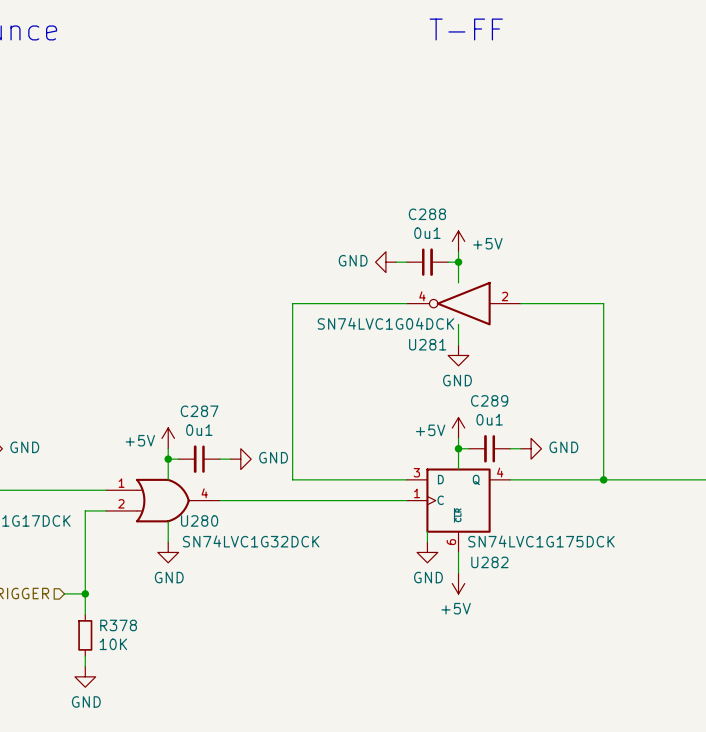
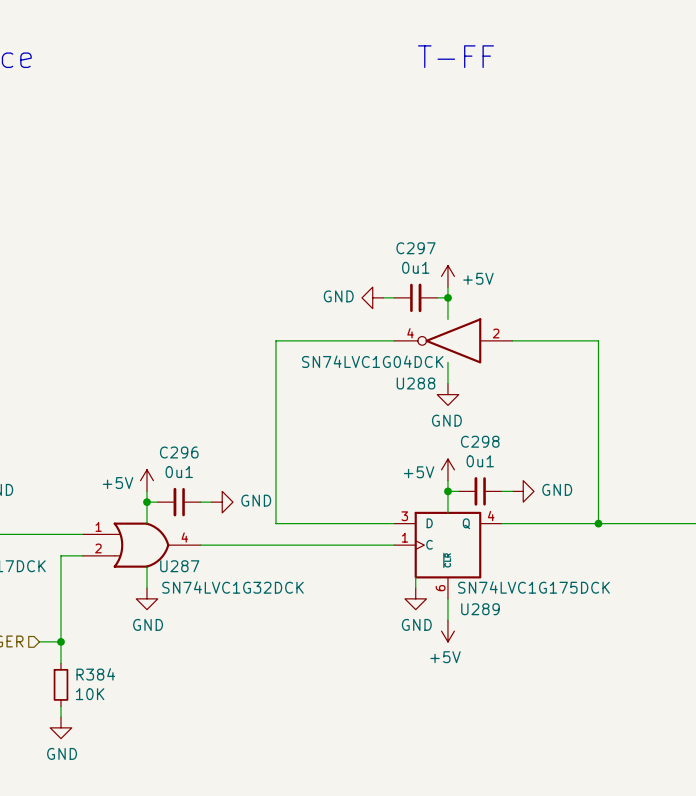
C288 name: C288 (427, 214) -> C297 (415, 248)
U281 name: U281 (427, 344) -> U288 (415, 383)
C289 name: C289 (489, 400) -> C298 (480, 441)
C287 name: C287 (199, 411) -> C296 (179, 452)
U280 name: U280 (199, 520) -> U287 (179, 566)
U282 name: U282 (489, 562) -> U289 (480, 609)
R378 name: R378 (118, 625) -> R384 (95, 674)

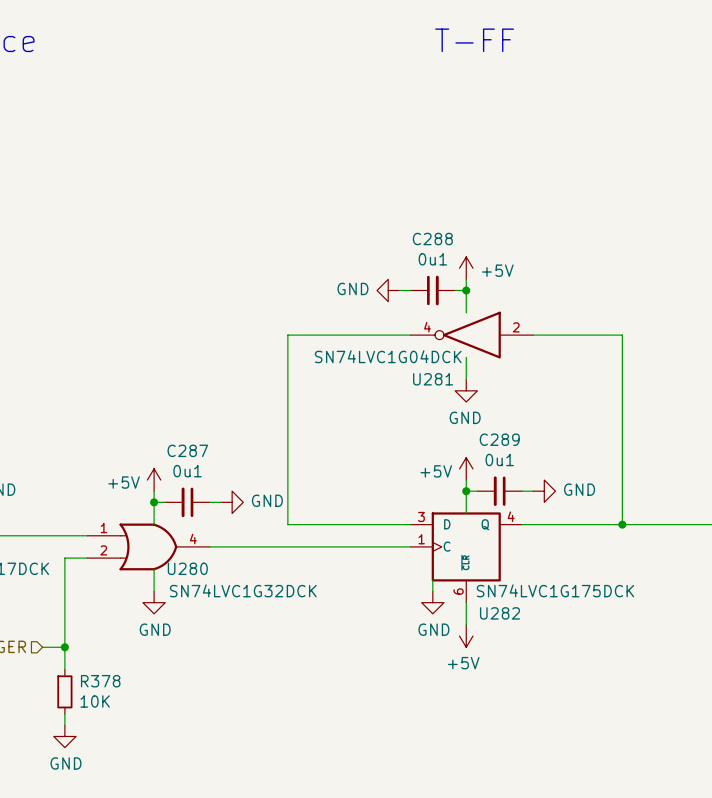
C297 name: C297 (415, 248) -> C288 (432, 239)
U288 name: U288 (415, 383) -> U281 (433, 379)
C298 name: C298 (480, 441) -> C289 (499, 439)
C296 name: C296 (179, 452) -> C287 (187, 450)
U287 name: U287 (179, 566) -> U280 (187, 568)
U289 name: U289 (480, 609) -> U282 (499, 613)
R384 name: R384 (95, 674) -> R378 (100, 681)

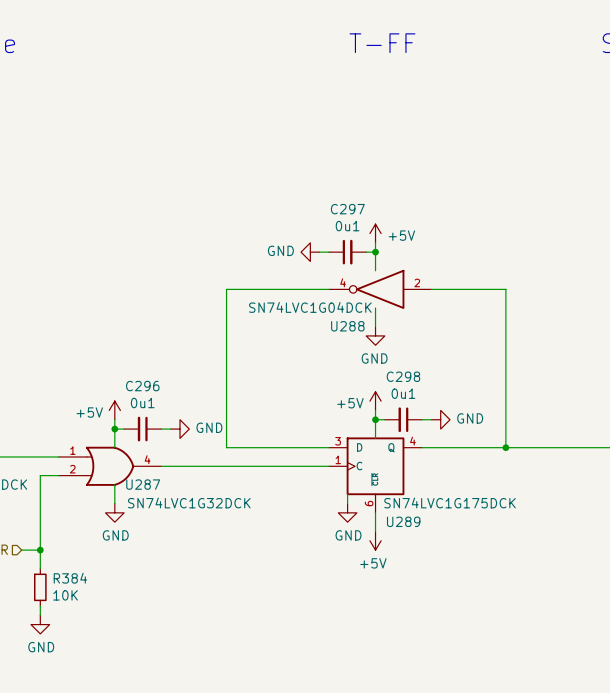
C288 name: C288 (432, 239) -> C297 (347, 209)
U281 name: U281 (433, 379) -> U288 (347, 326)
C289 name: C289 (499, 439) -> C298 (403, 376)
C287 name: C287 (187, 450) -> C296 (142, 386)
U280 name: U280 (187, 568) -> U287 (143, 484)
U282 name: U282 (499, 613) -> U289 (403, 521)
R378 name: R378 (100, 681) -> R384 (70, 578)

